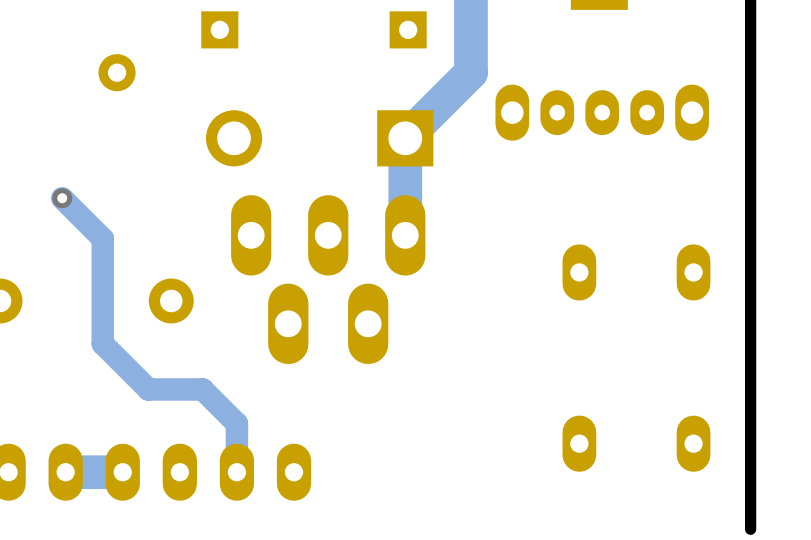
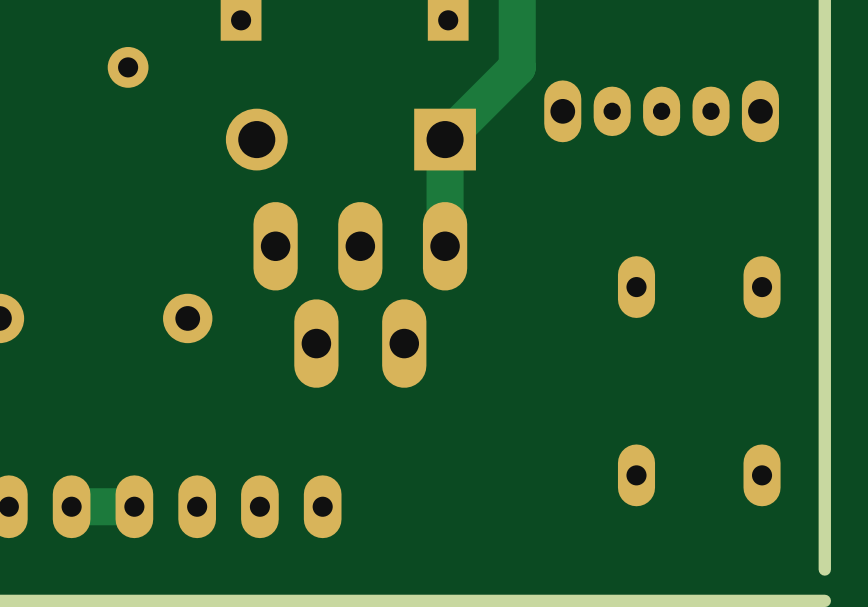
track: (62, 198) (102, 238) (102, 343) (148, 389) (202, 389) (236, 423) (236, 472) -> none
via: (62, 198) -> none

